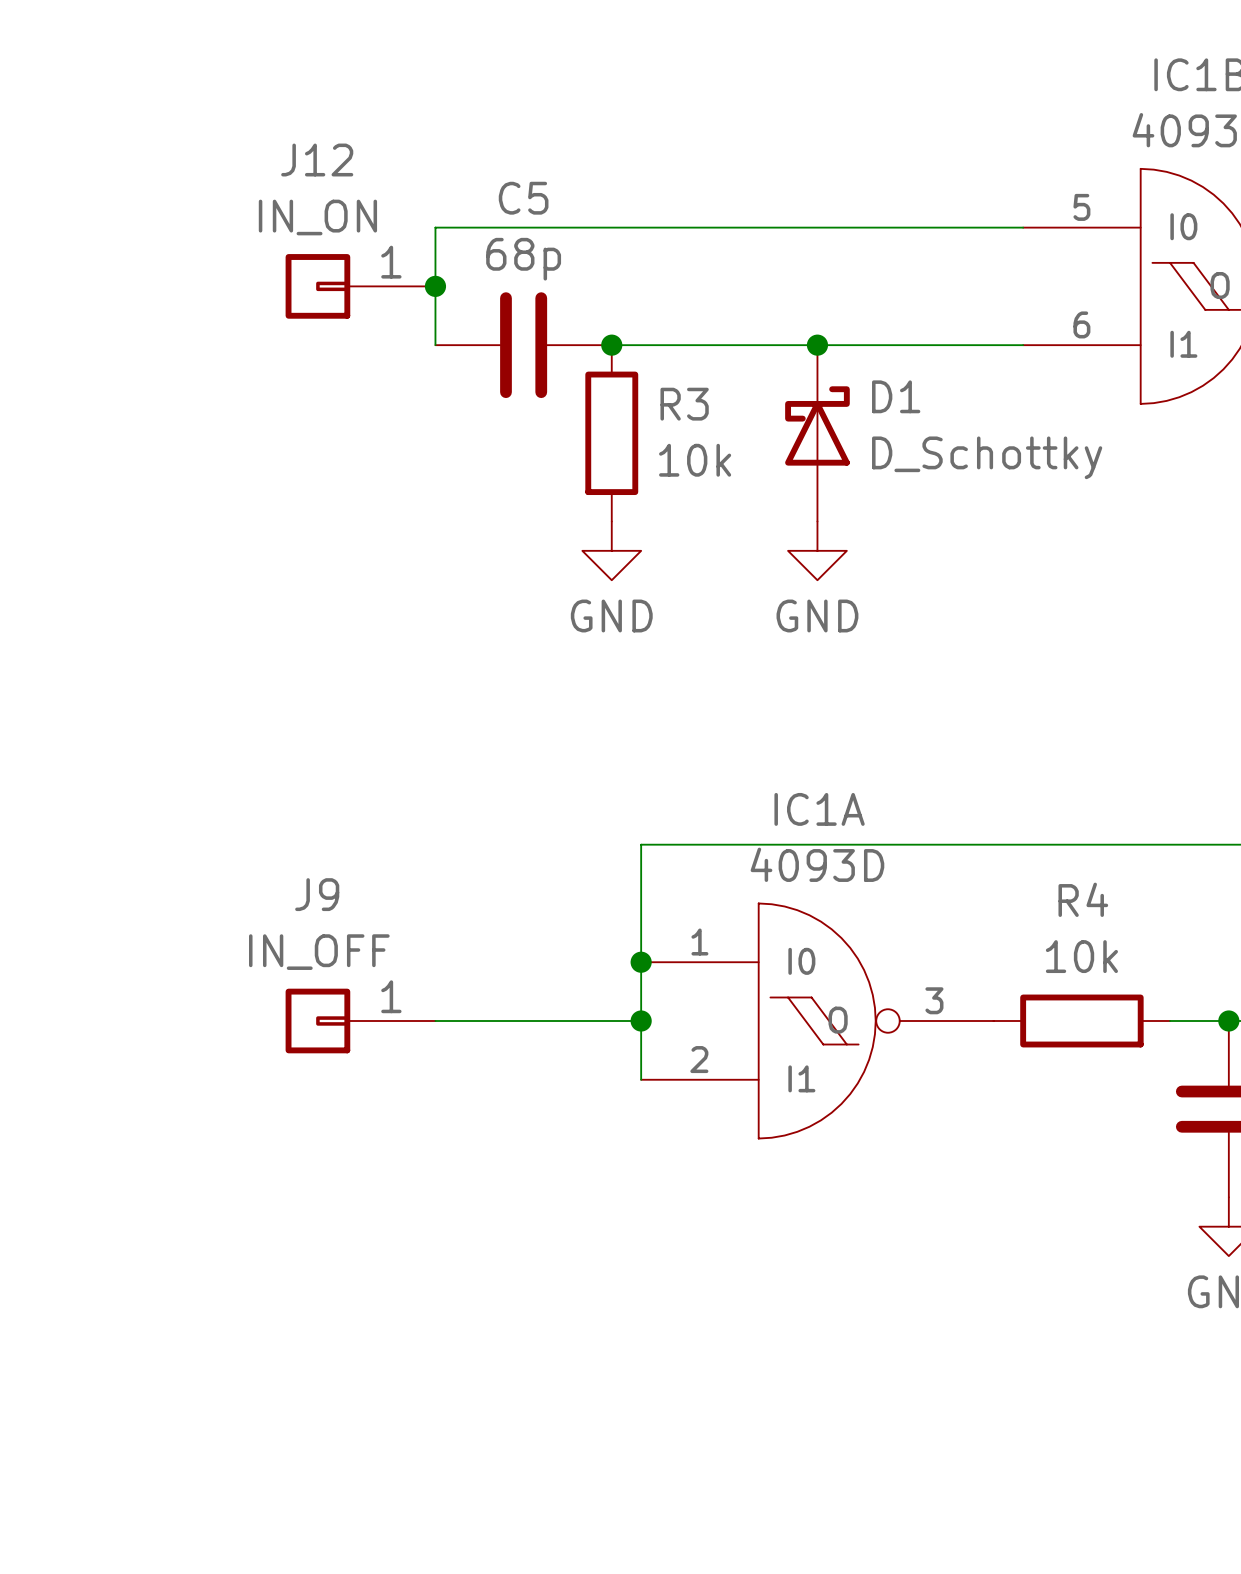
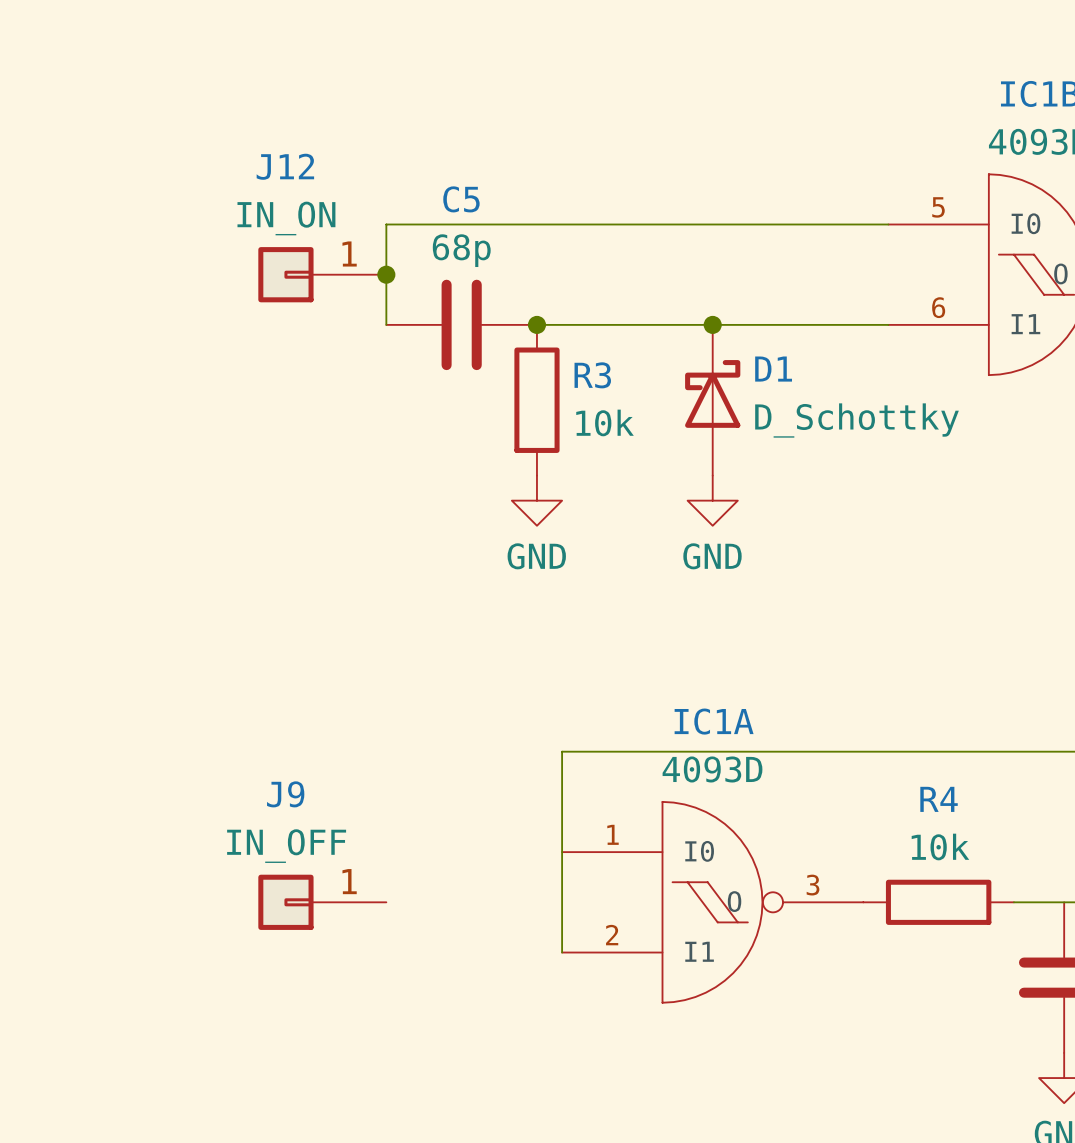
junction: (641, 962) -> none
wire: (435, 1020) (641, 1020) -> none
junction: (641, 1020) -> none
junction: (1228, 1020) -> none

